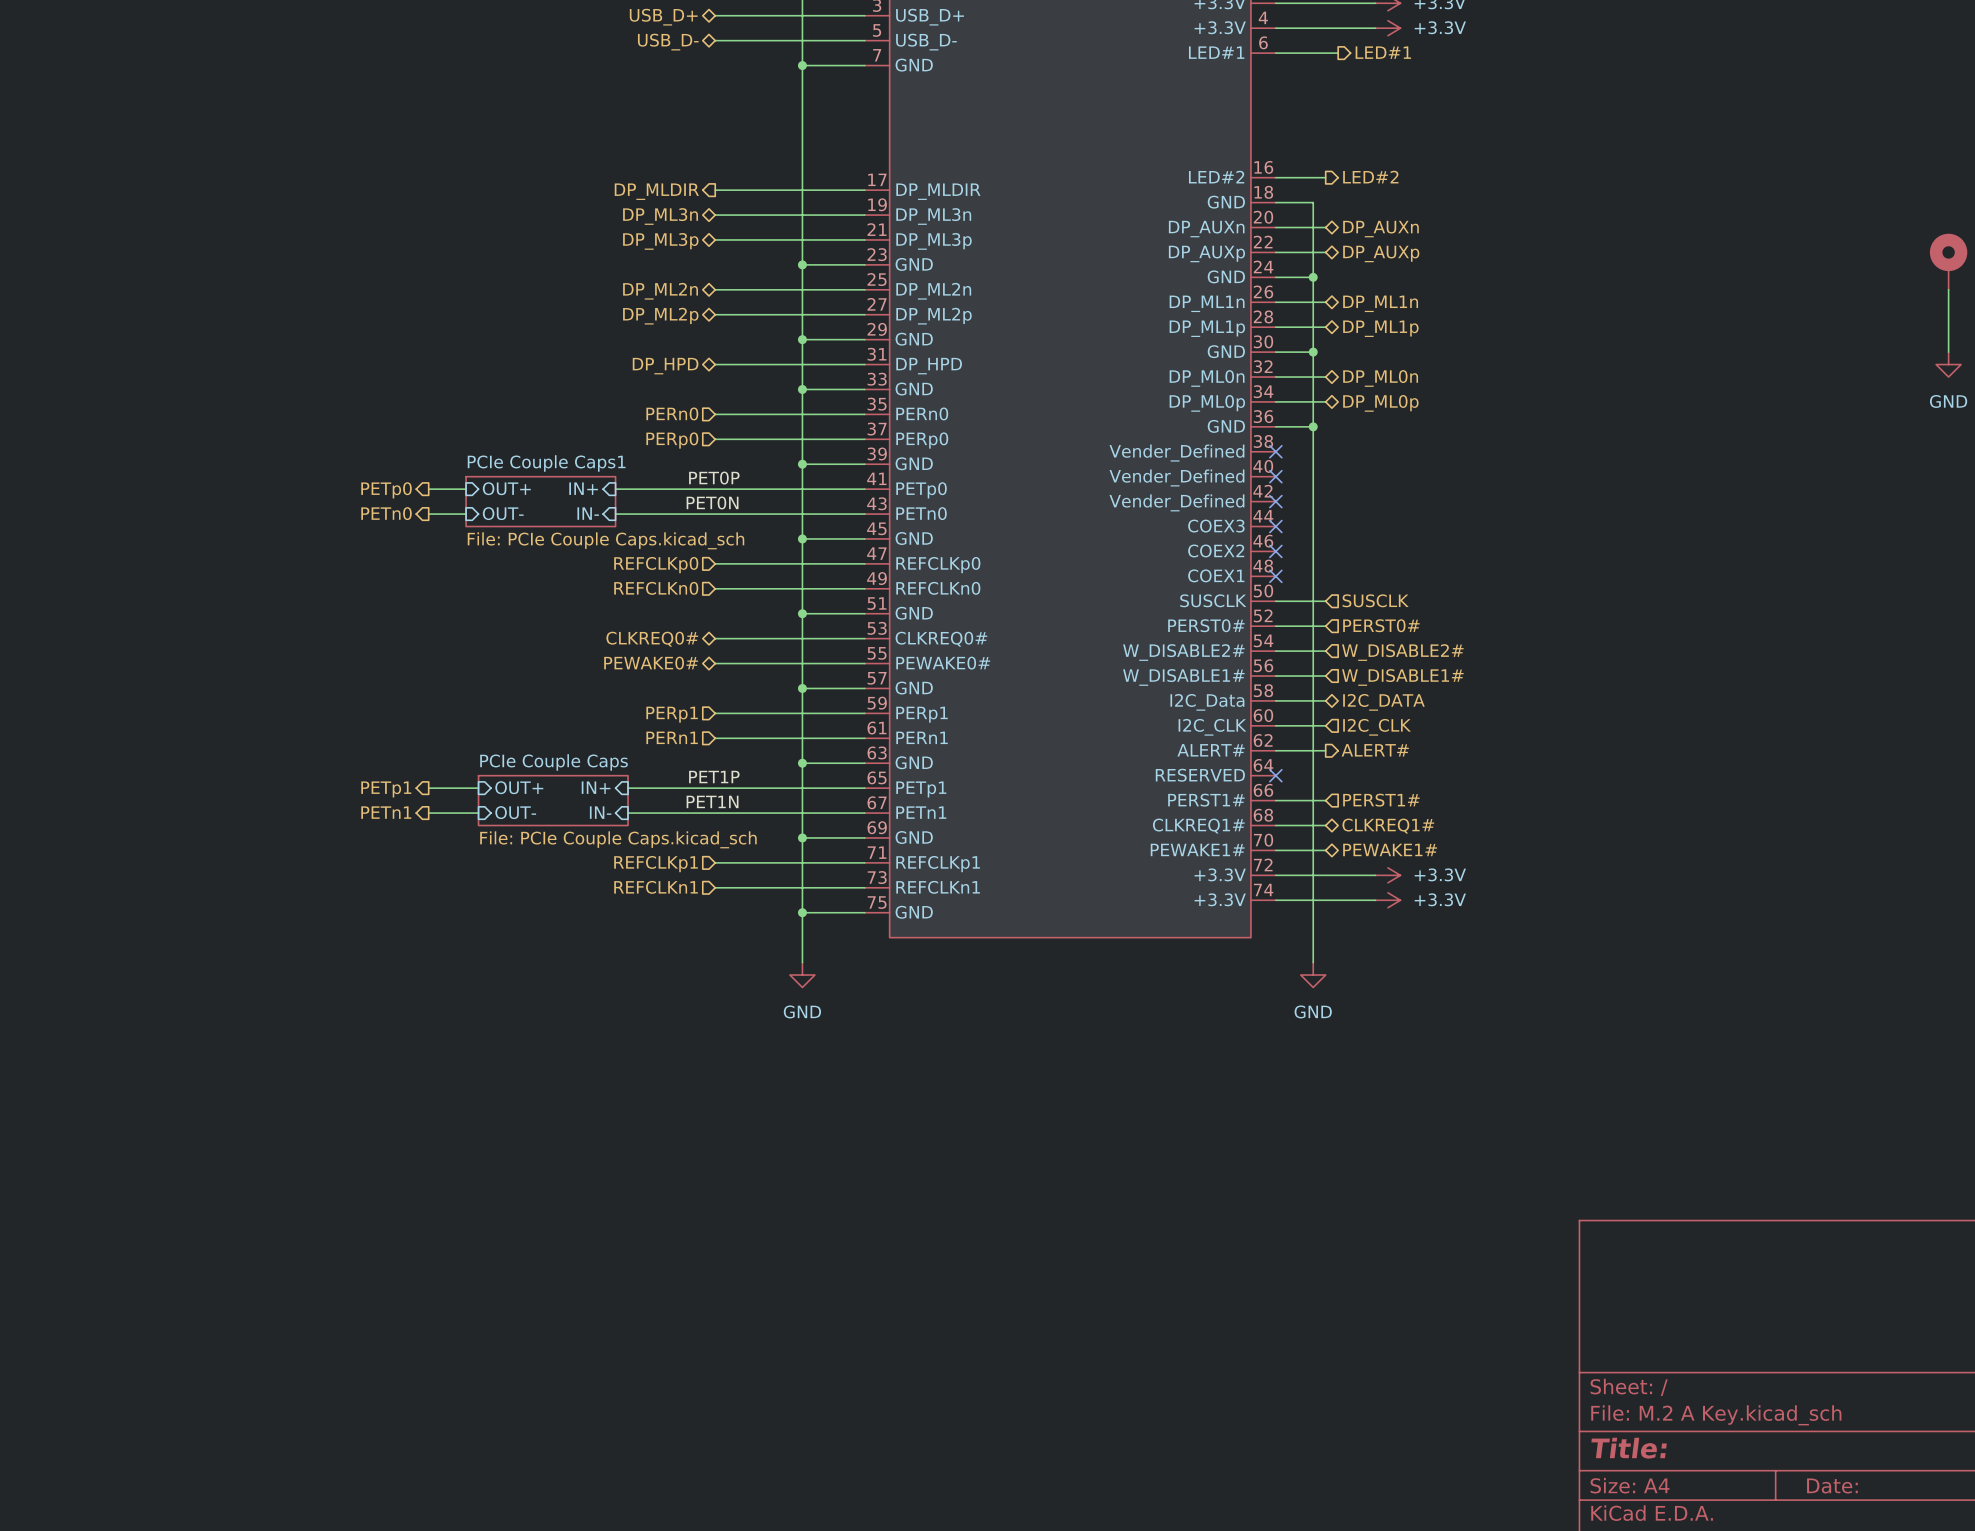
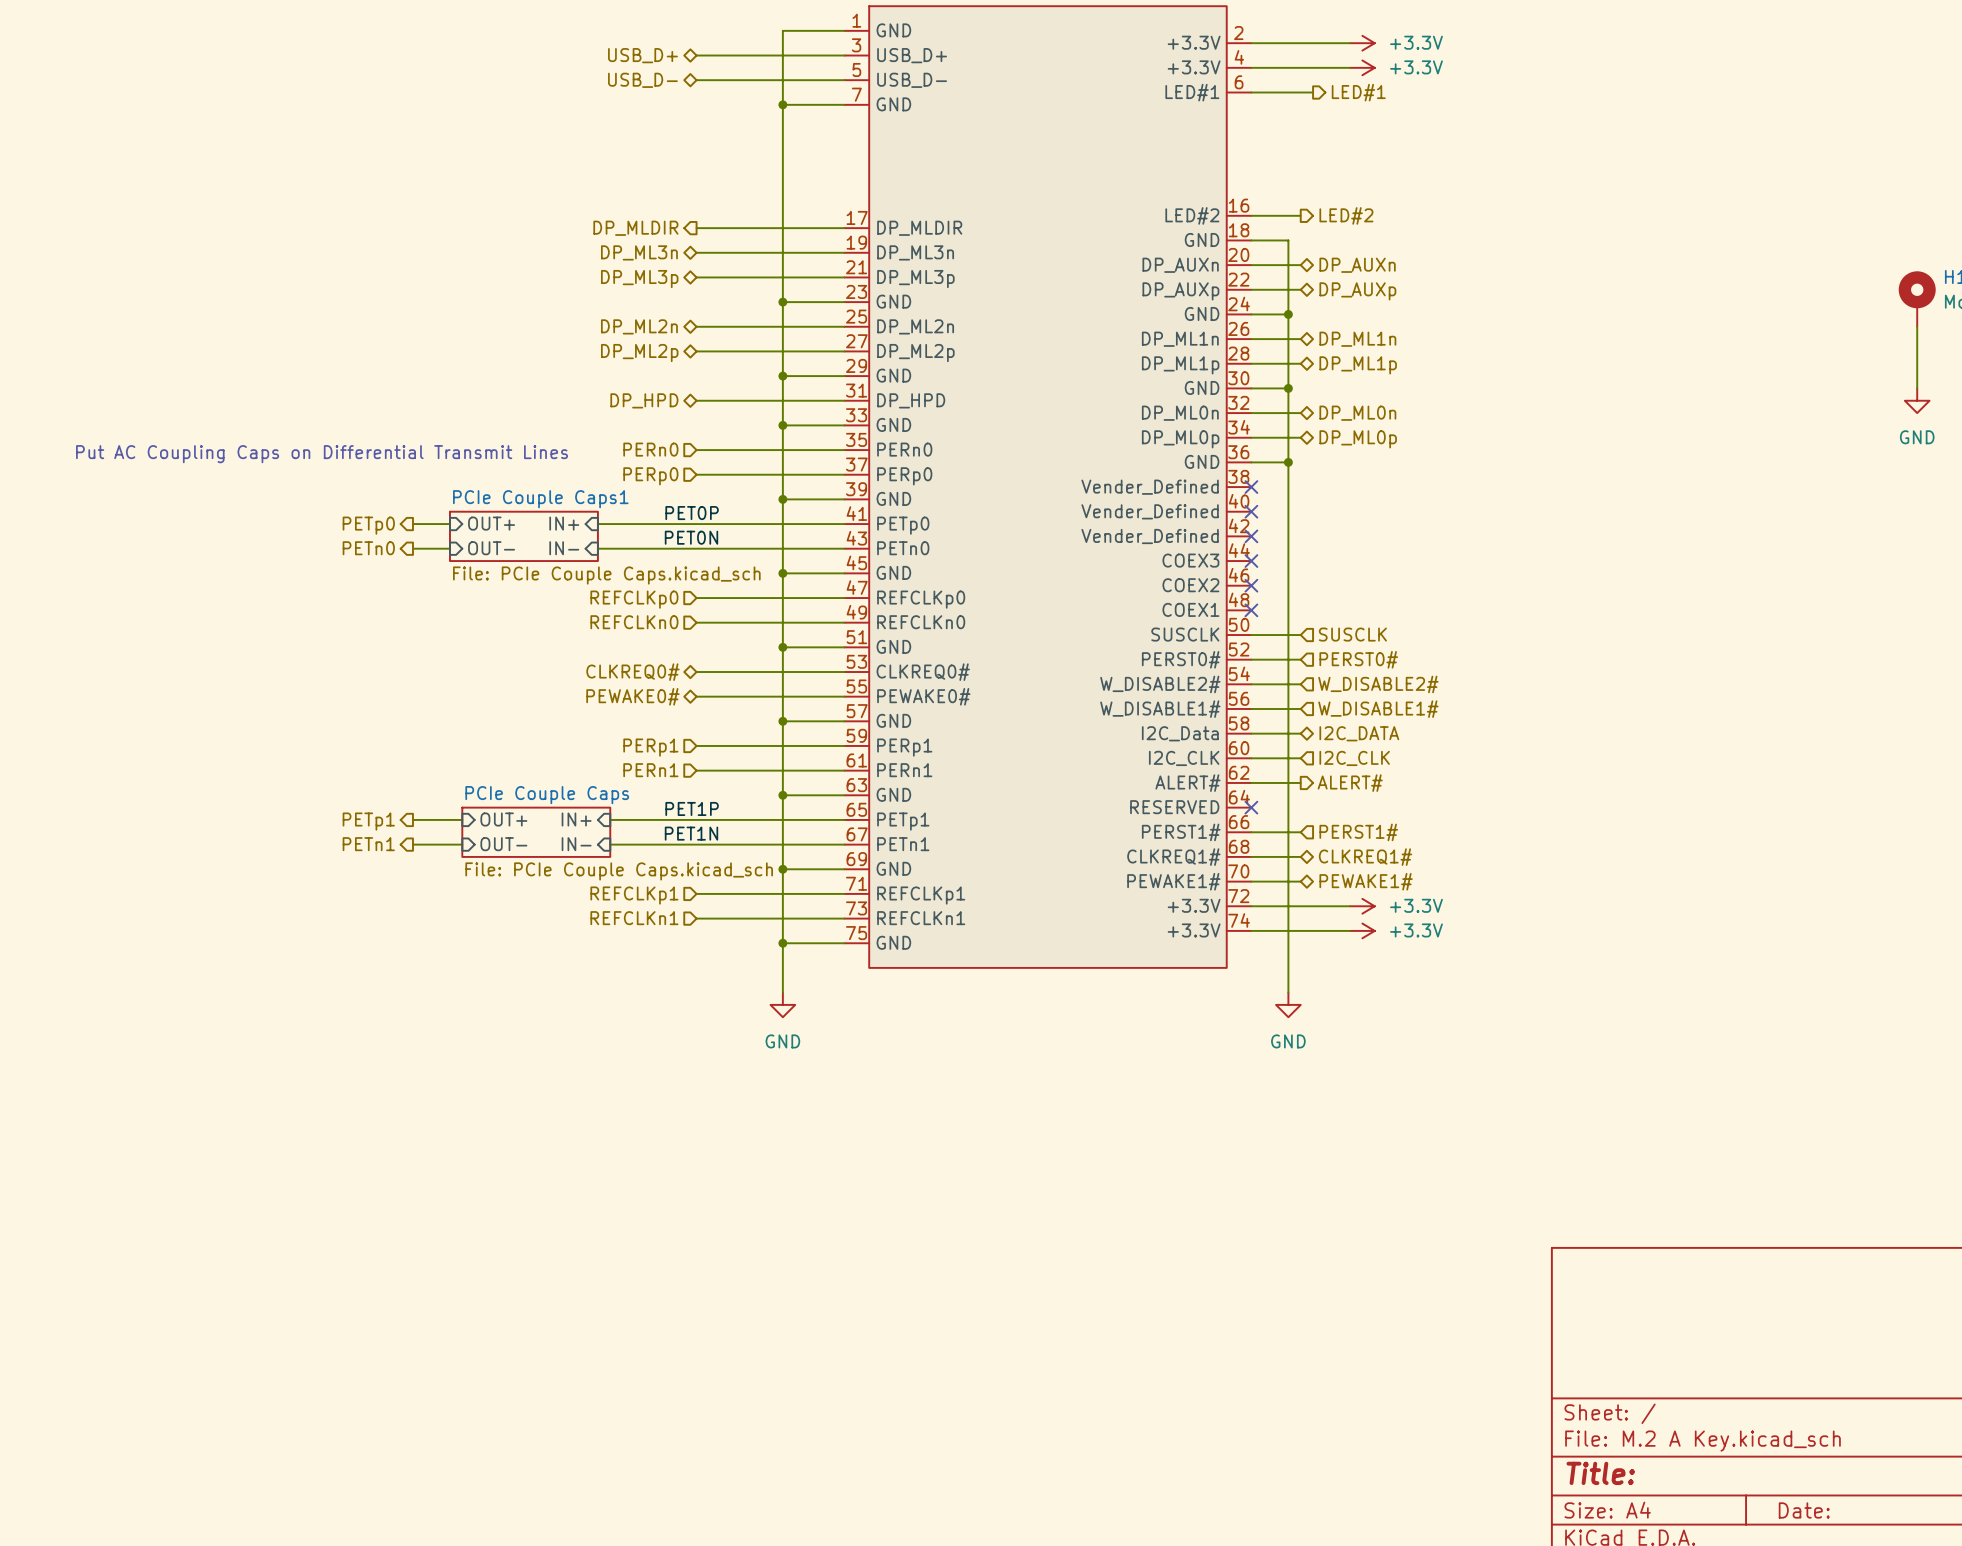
text: none -> Put AC Coupling Caps on Differential Transmit Lines (322, 454)

